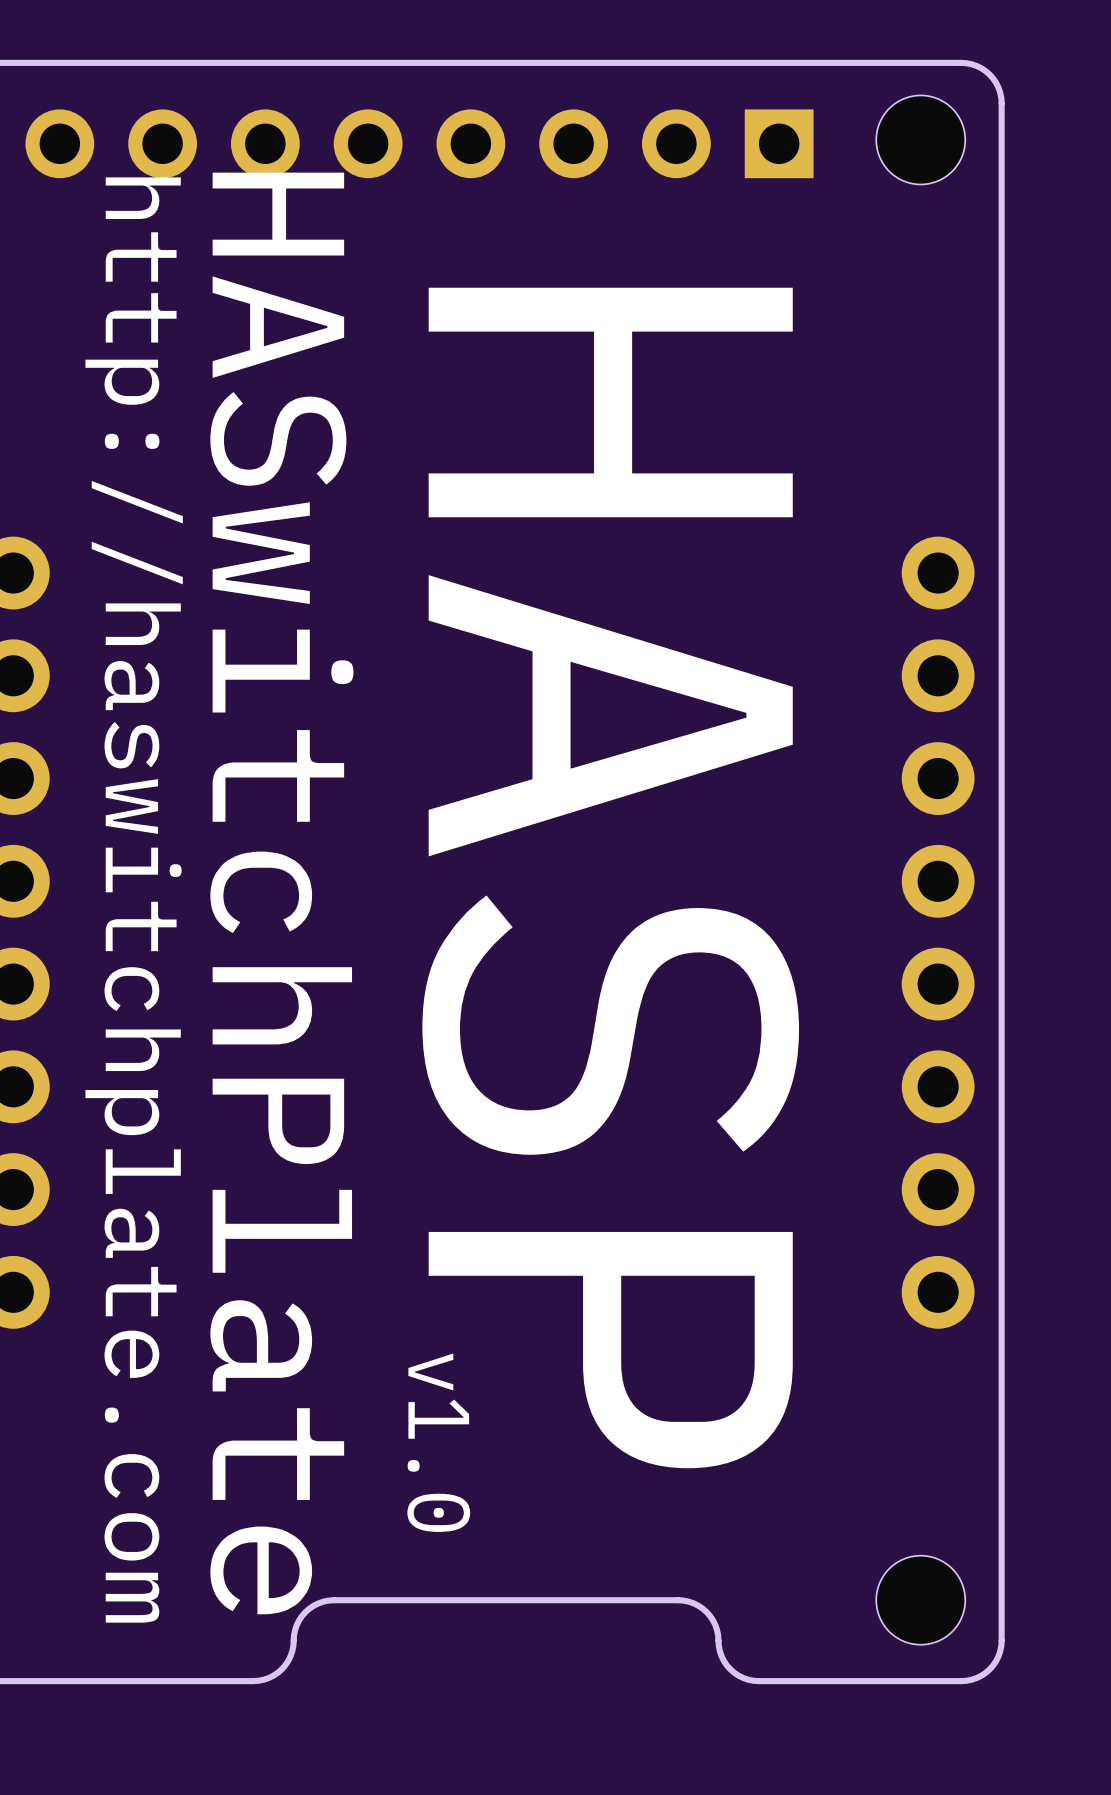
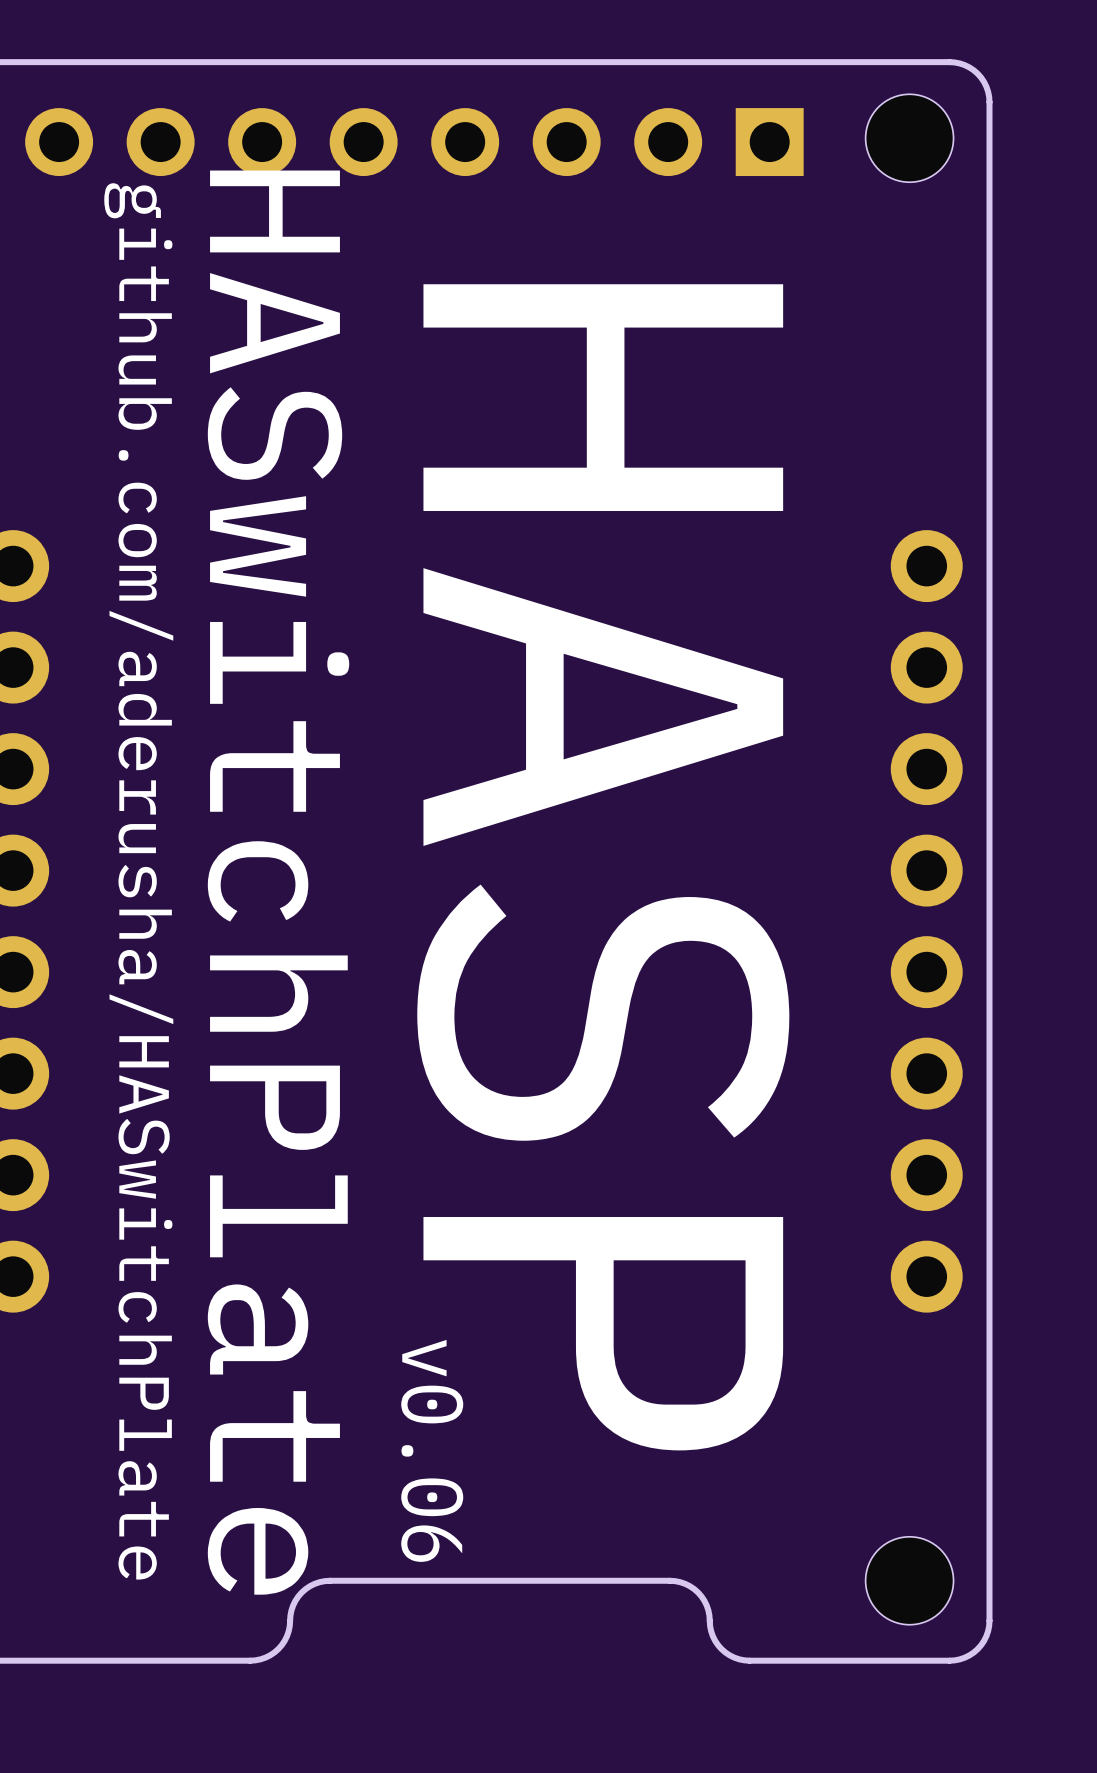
text: http://haswitchplate.com (134, 900) -> github.com/aderusha/HASwitchPlate (138, 881)
text: v1.0 (438, 1442) -> v0.06 (432, 1450)

